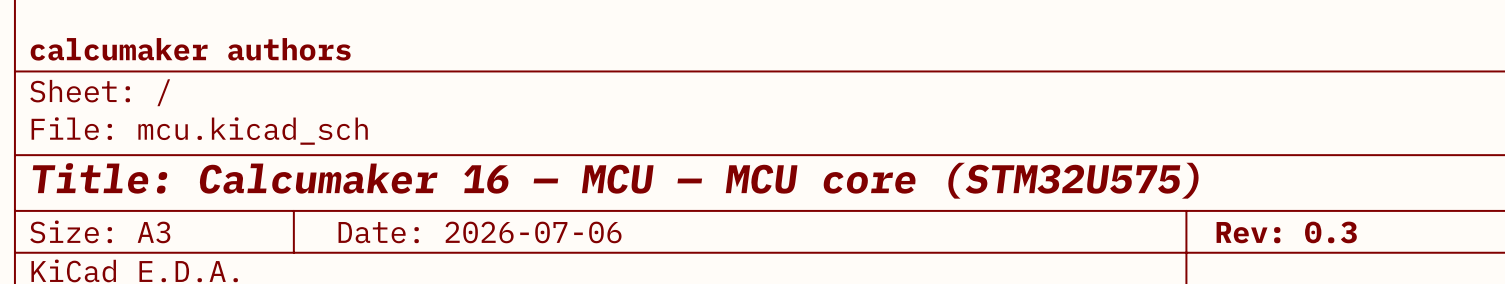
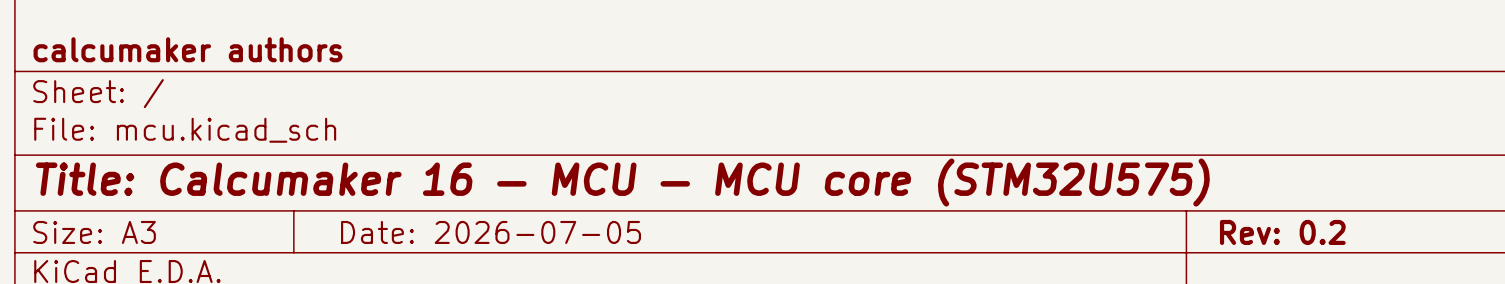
title block: Date: 2026-07-06 (480, 232) -> Date: 2026-07-05 (491, 232)
title block: Rev: 0.3 (1286, 232) -> Rev: 0.2 (1282, 232)

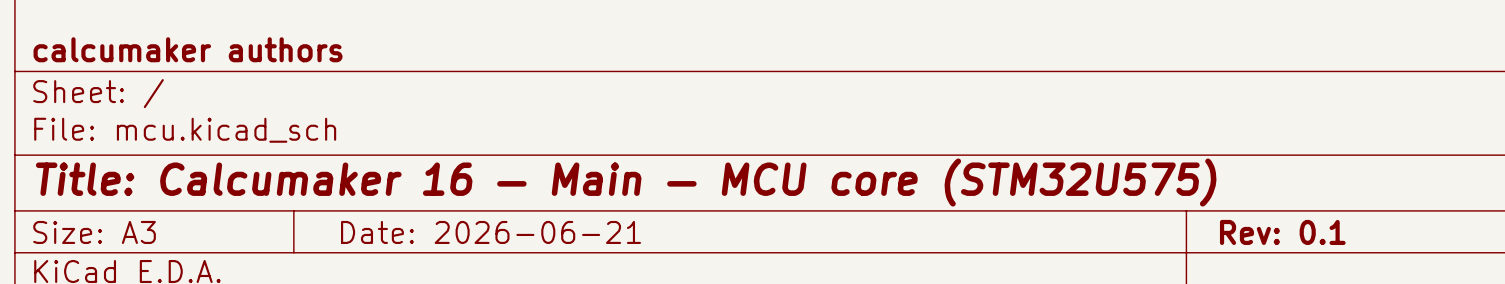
title block: Title: Calcumaker 16 — MCU — MCU core (STM32U575) (622, 182) -> Title: Calcumaker 16 — Main — MCU core (STM32U575) (626, 182)
title block: Date: 2026-07-05 (491, 232) -> Date: 2026-06-21 (491, 232)
title block: Rev: 0.2 (1282, 232) -> Rev: 0.1 (1282, 232)

